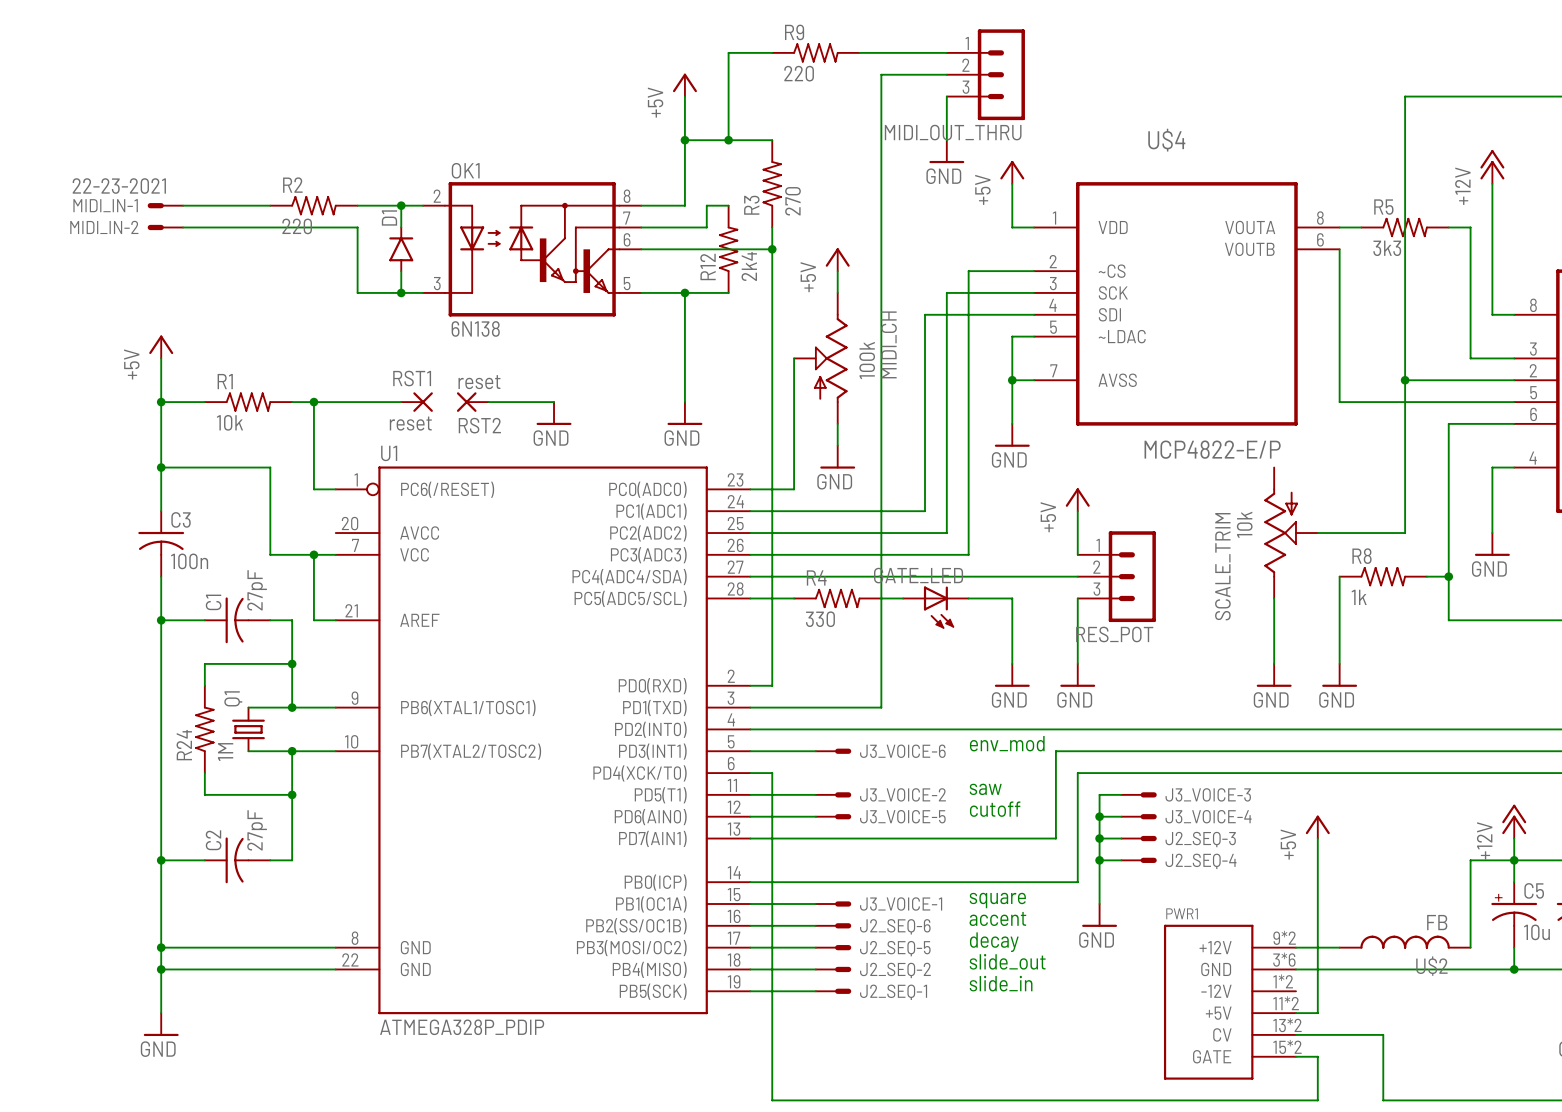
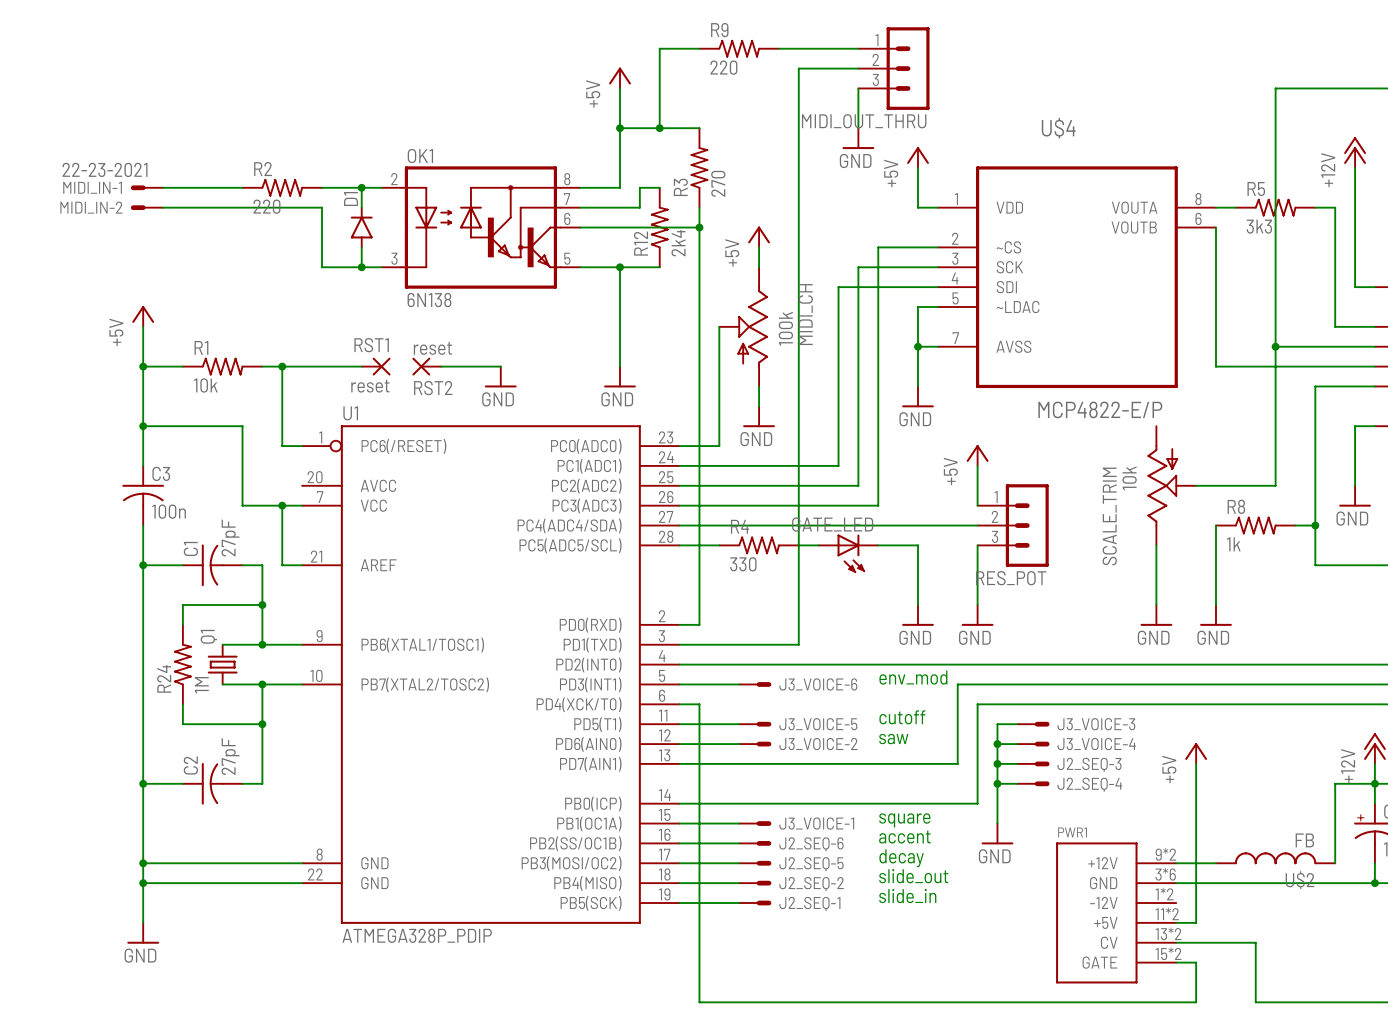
text: saw (985, 789) -> cutoff (902, 717)
J3_VOICE-2 name: J3_VOICE-2 (902, 794) -> J3_VOICE-5 (818, 724)
text: cutoff (995, 809) -> saw (893, 739)
J3_VOICE-5 name: J3_VOICE-5 (902, 816) -> J3_VOICE-2 (818, 744)

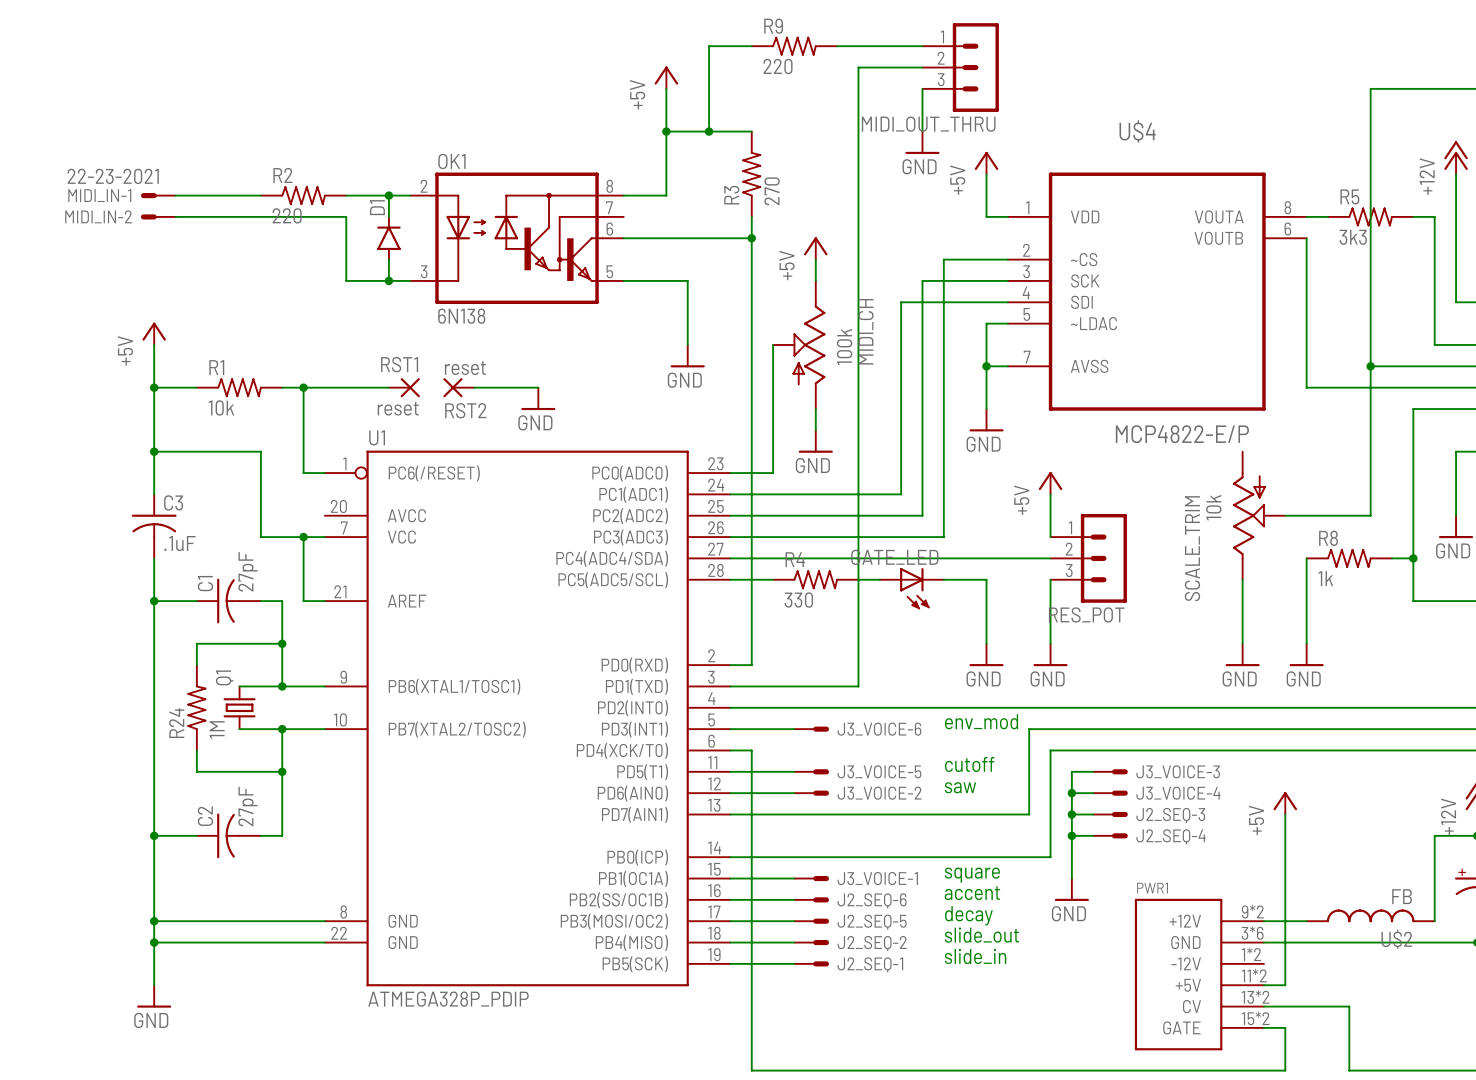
wire: (659, 187) (639, 187) (639, 207) (580, 207) -> none
R12: 2k4 (659, 227) -> none
wire: (619, 267) (619, 366) -> none
junction: (619, 267) -> none
wire: (639, 267) (659, 267) -> (687, 280) (687, 344)
power symbol position: GND (619, 377) -> GND (687, 356)
C3 value: 100n (169, 511) -> .1uF (179, 543)

